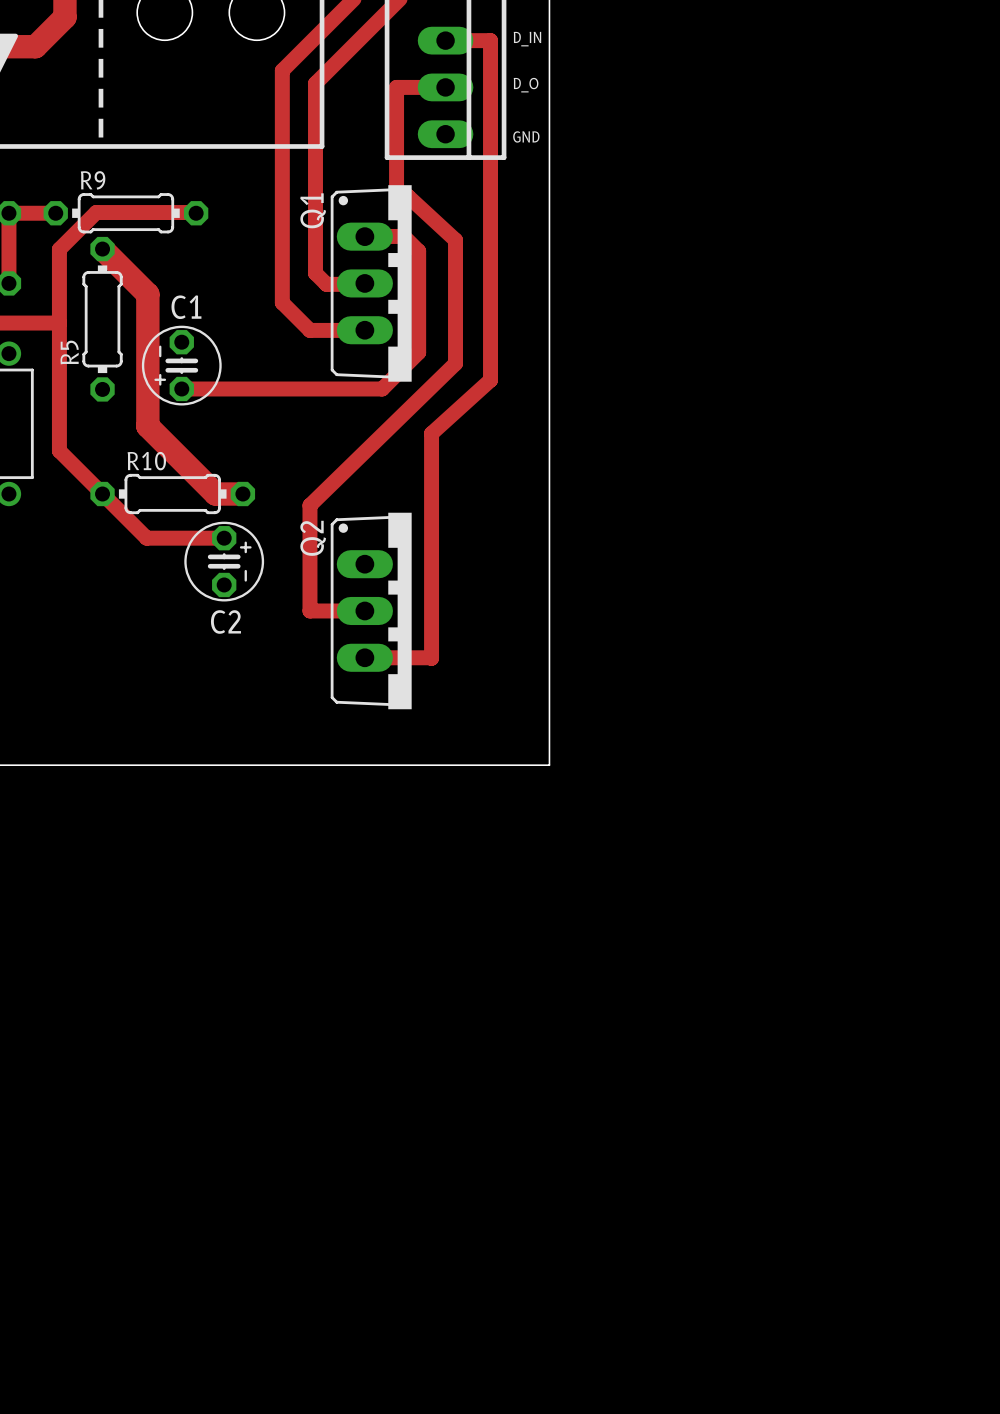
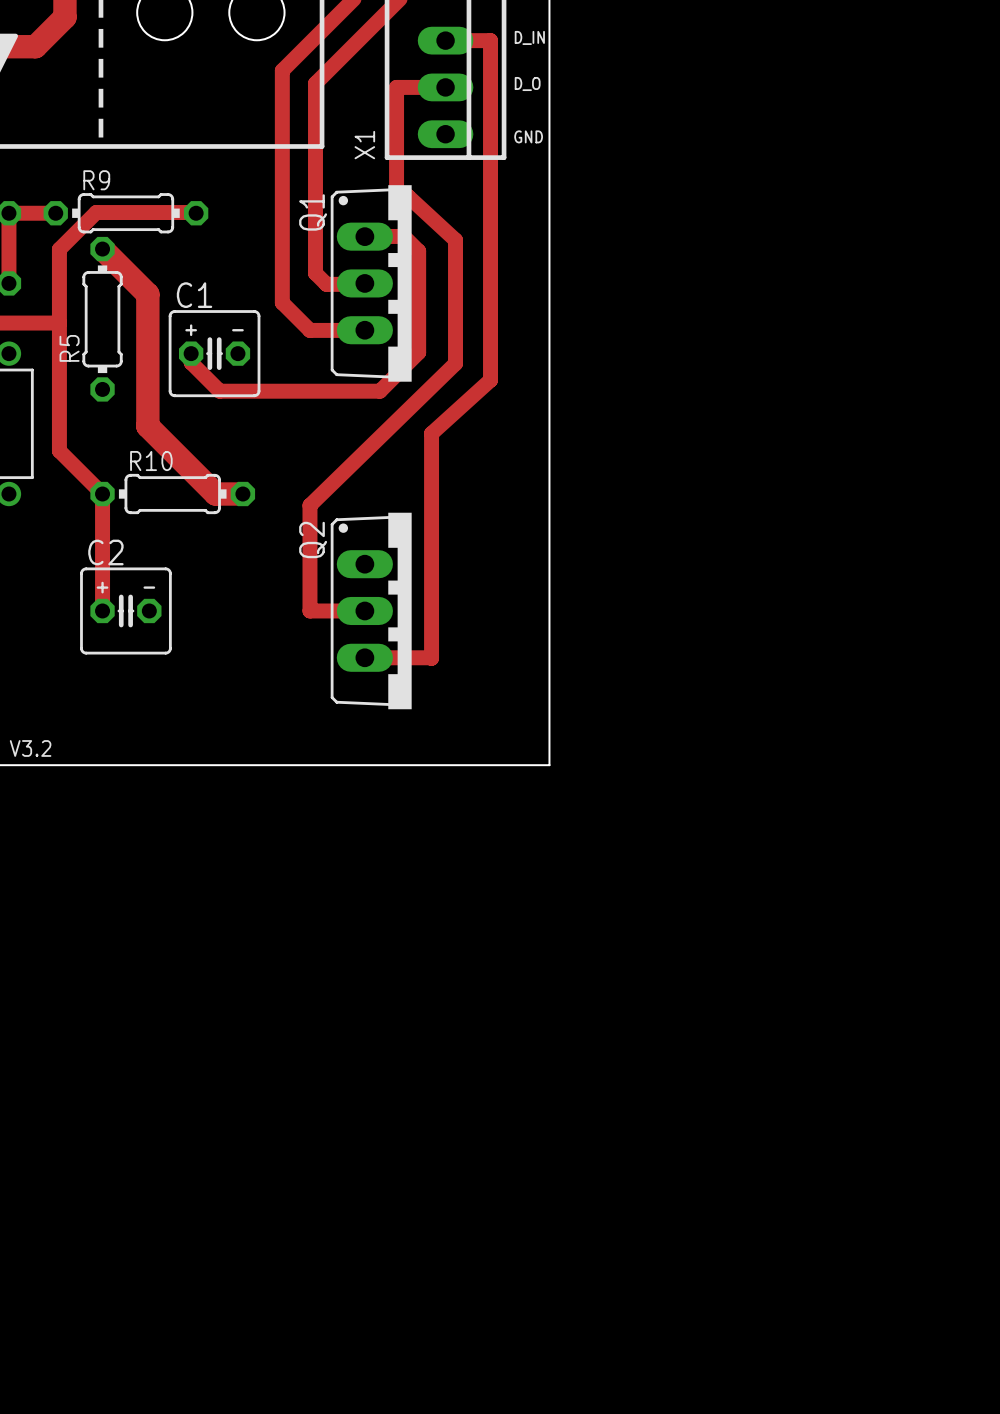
X1 name: none -> X1 (364, 145)
C1 footprint: [141, 325, 222, 406] -> [168, 310, 261, 398]
track: (181, 389) (382, 389) -> (191, 353) (191, 362) (219, 391) (379, 391) (382, 389)
track: (102, 494) (146, 538) (224, 538) -> (102, 494) (102, 610)
C2 footprint: [184, 521, 265, 602] -> [80, 567, 172, 655]
C2 name position: C2 (225, 621) -> C2 (105, 552)

